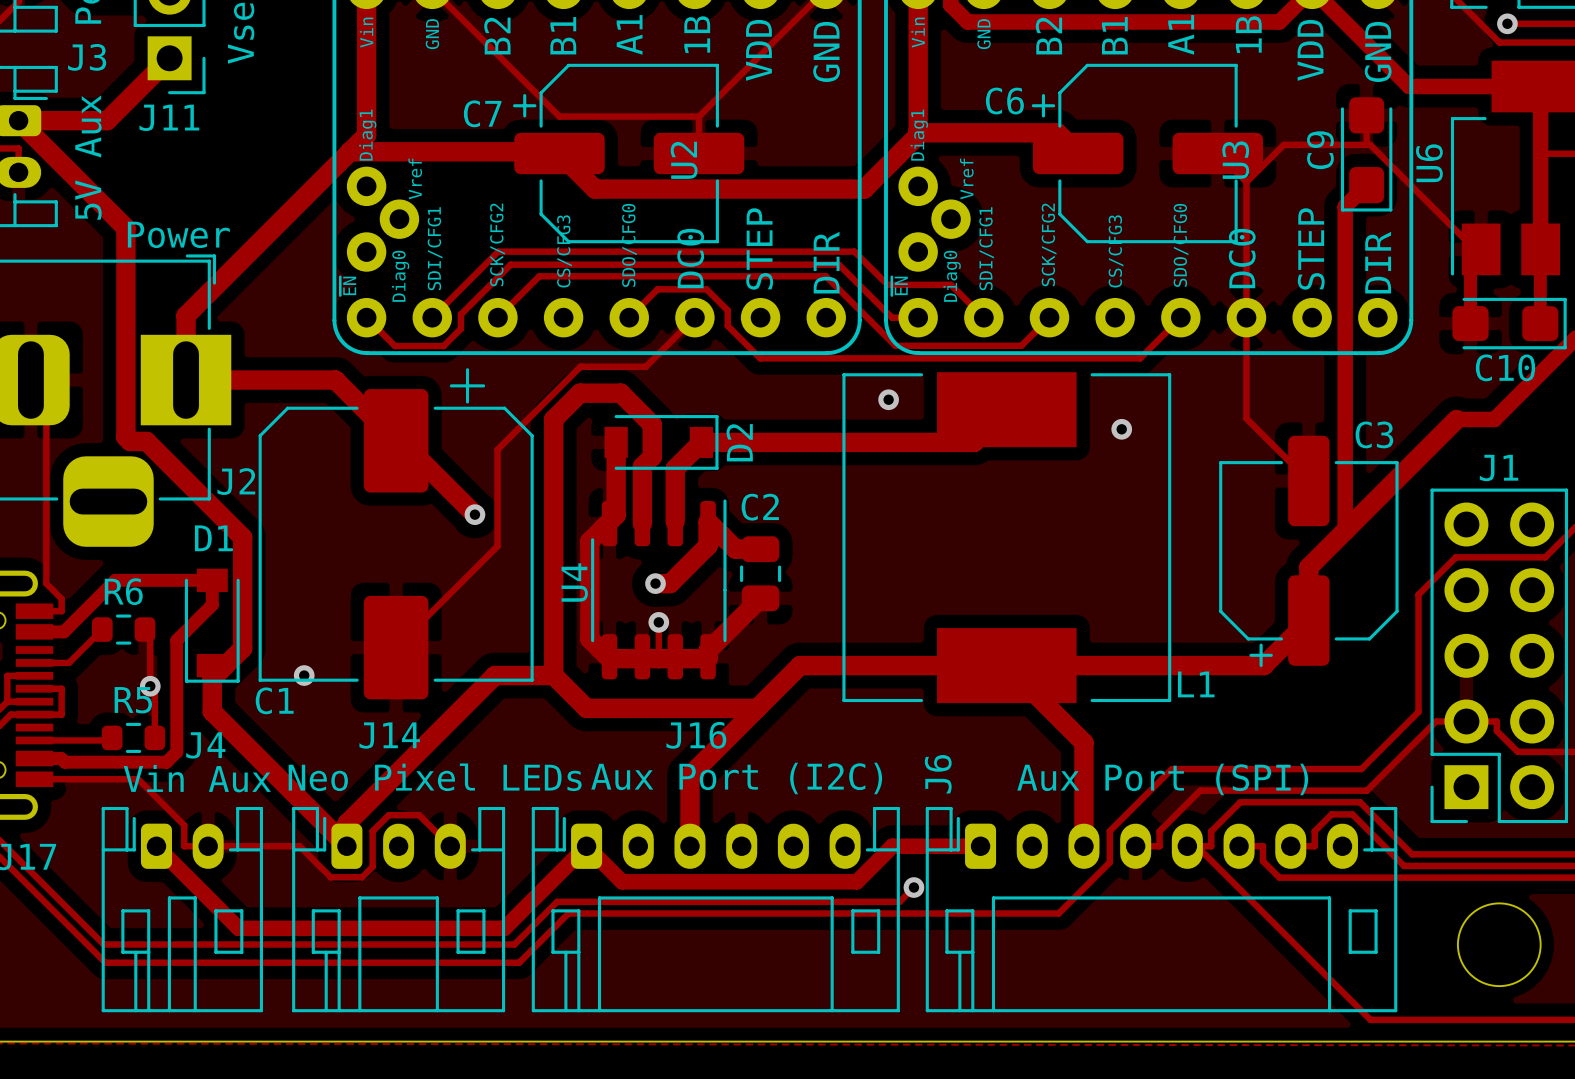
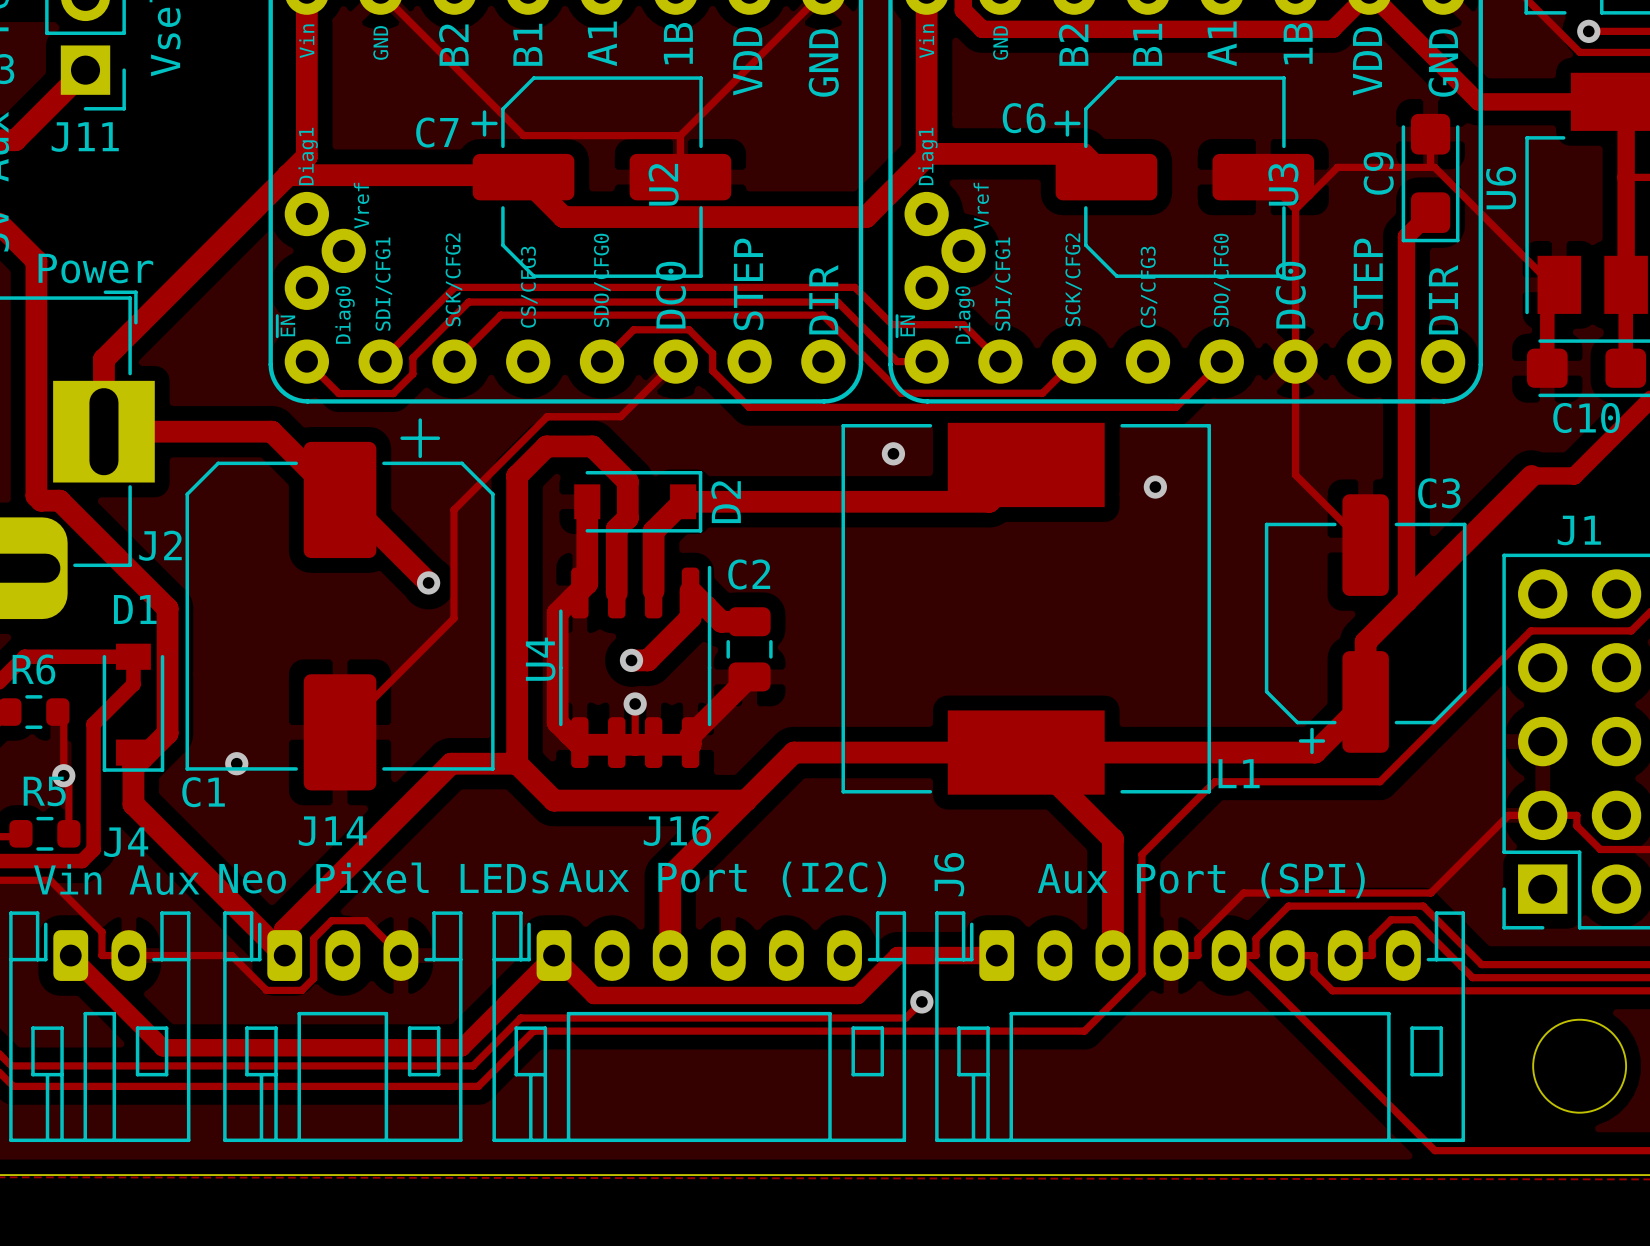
track: (1418, 594) (1418, 712) (1361, 769) (1171, 769) (1109, 831) -> (1488, 672) (1380, 781) (1214, 781) (1141, 854) (1141, 938)

